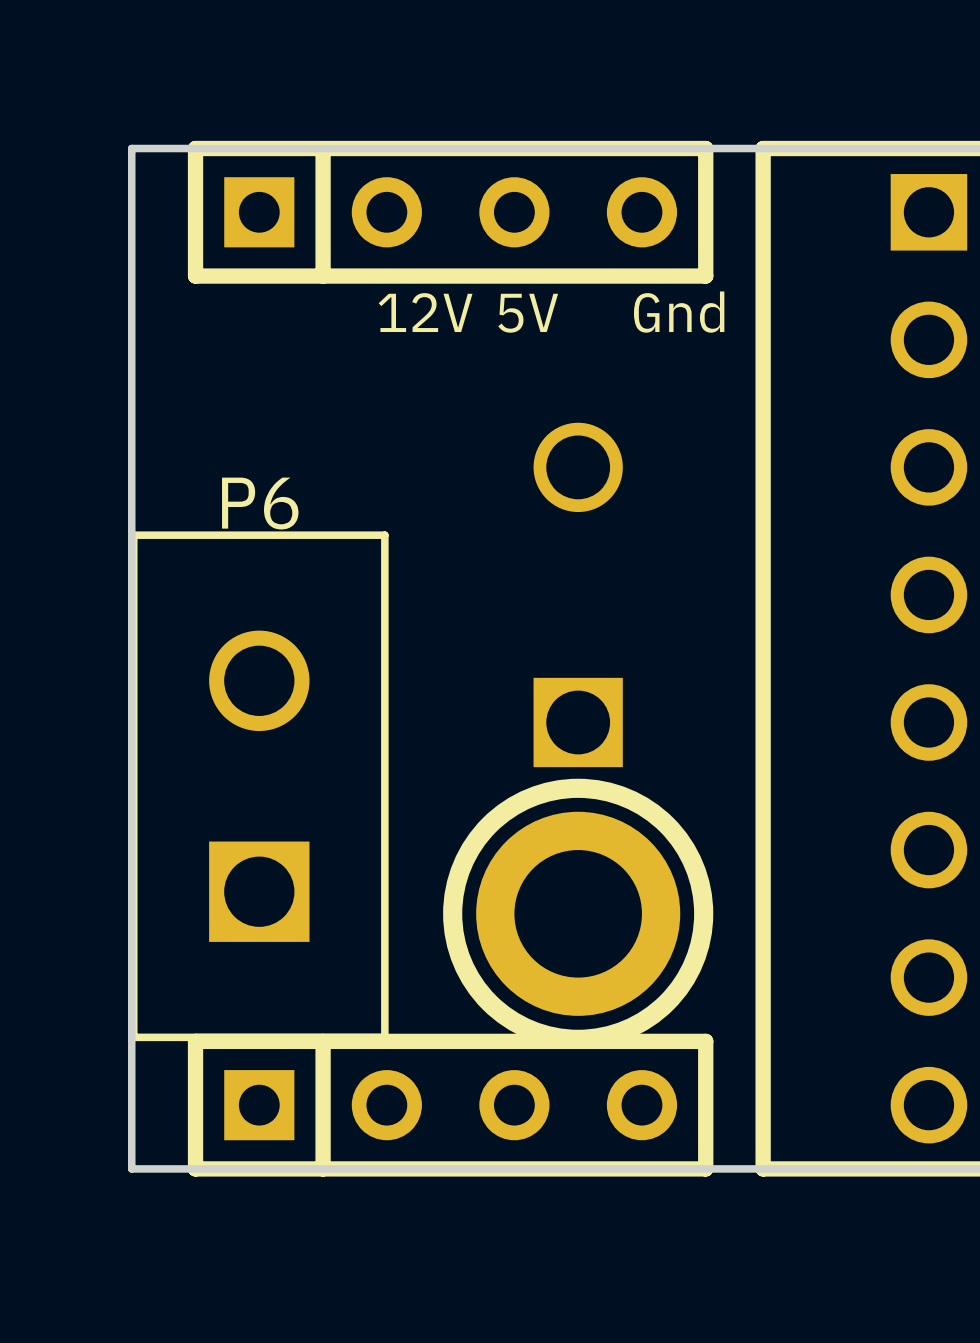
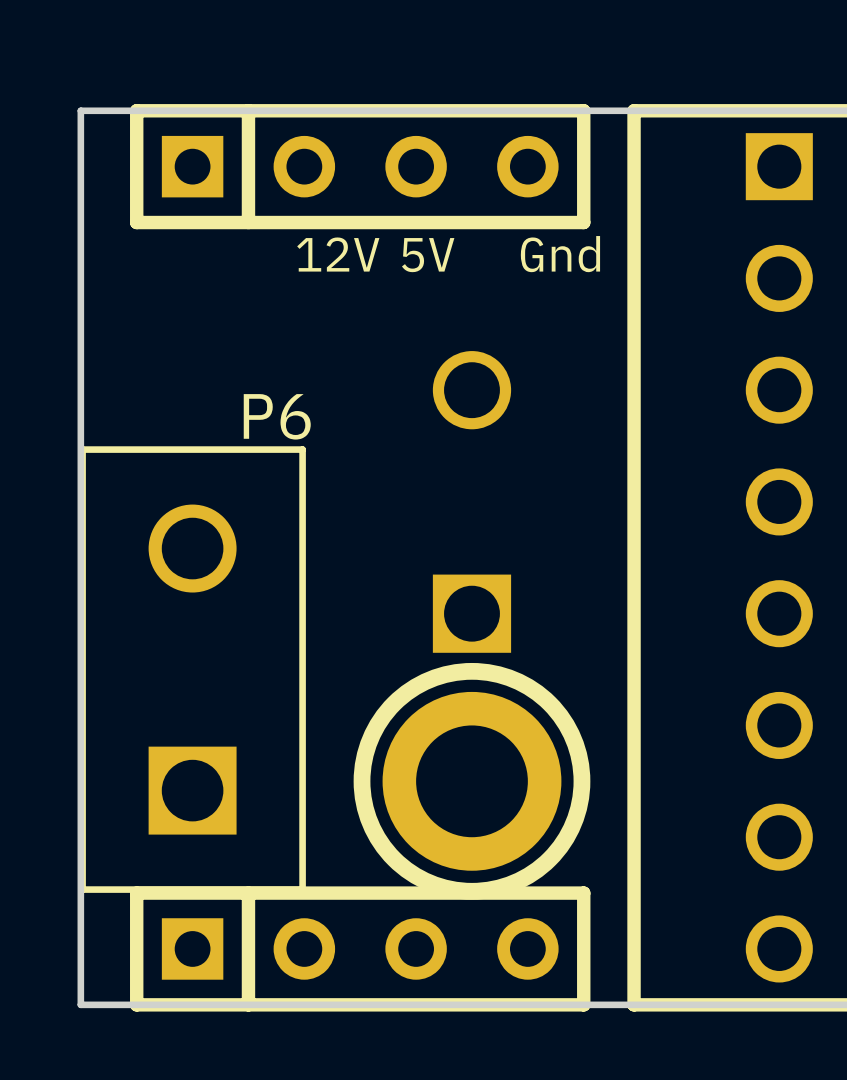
P6 name position: P6 (260, 503) -> P6 (277, 416)
P6 footprint: [129, 531, 389, 1042] -> [79, 446, 306, 893]

